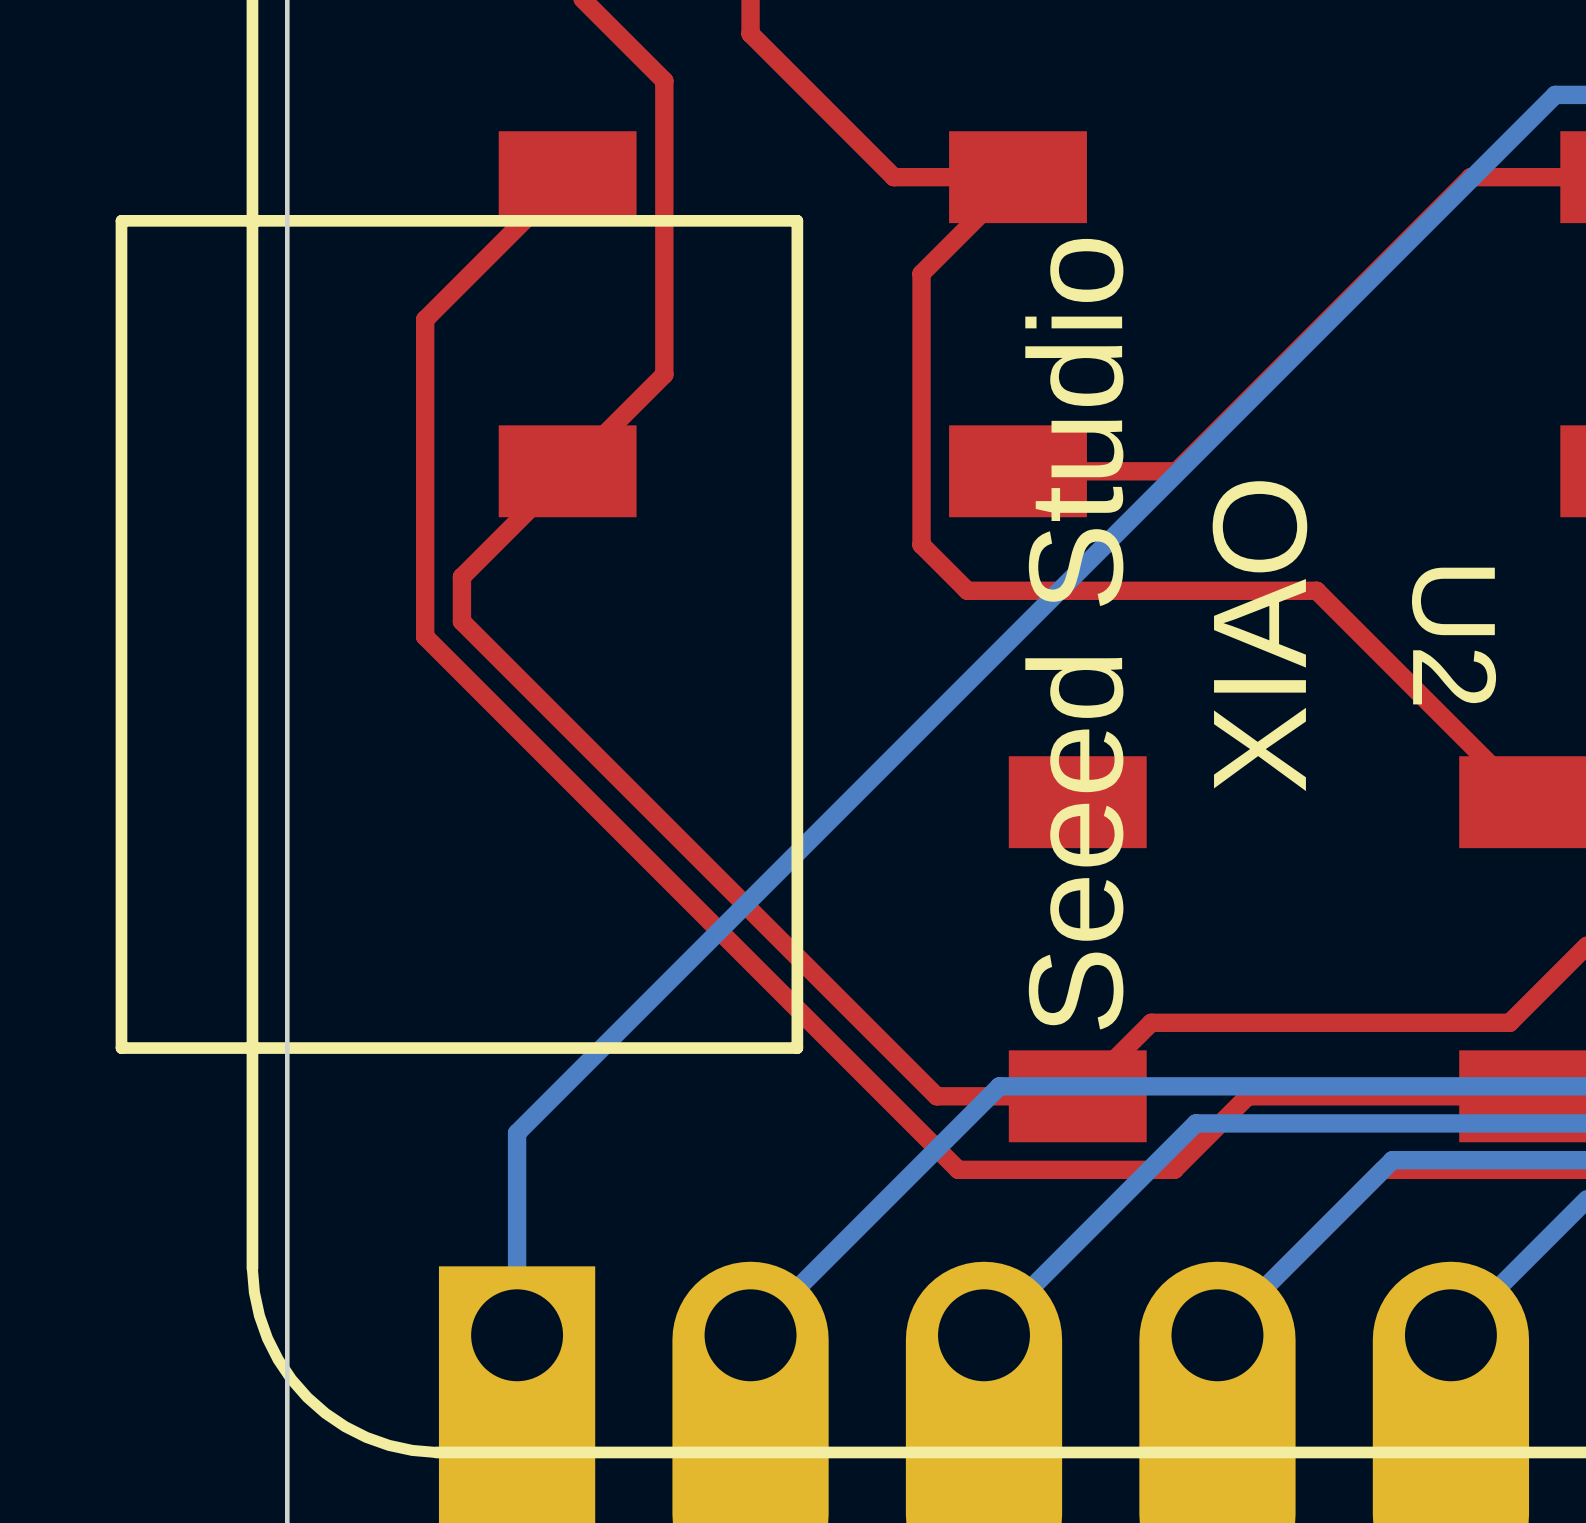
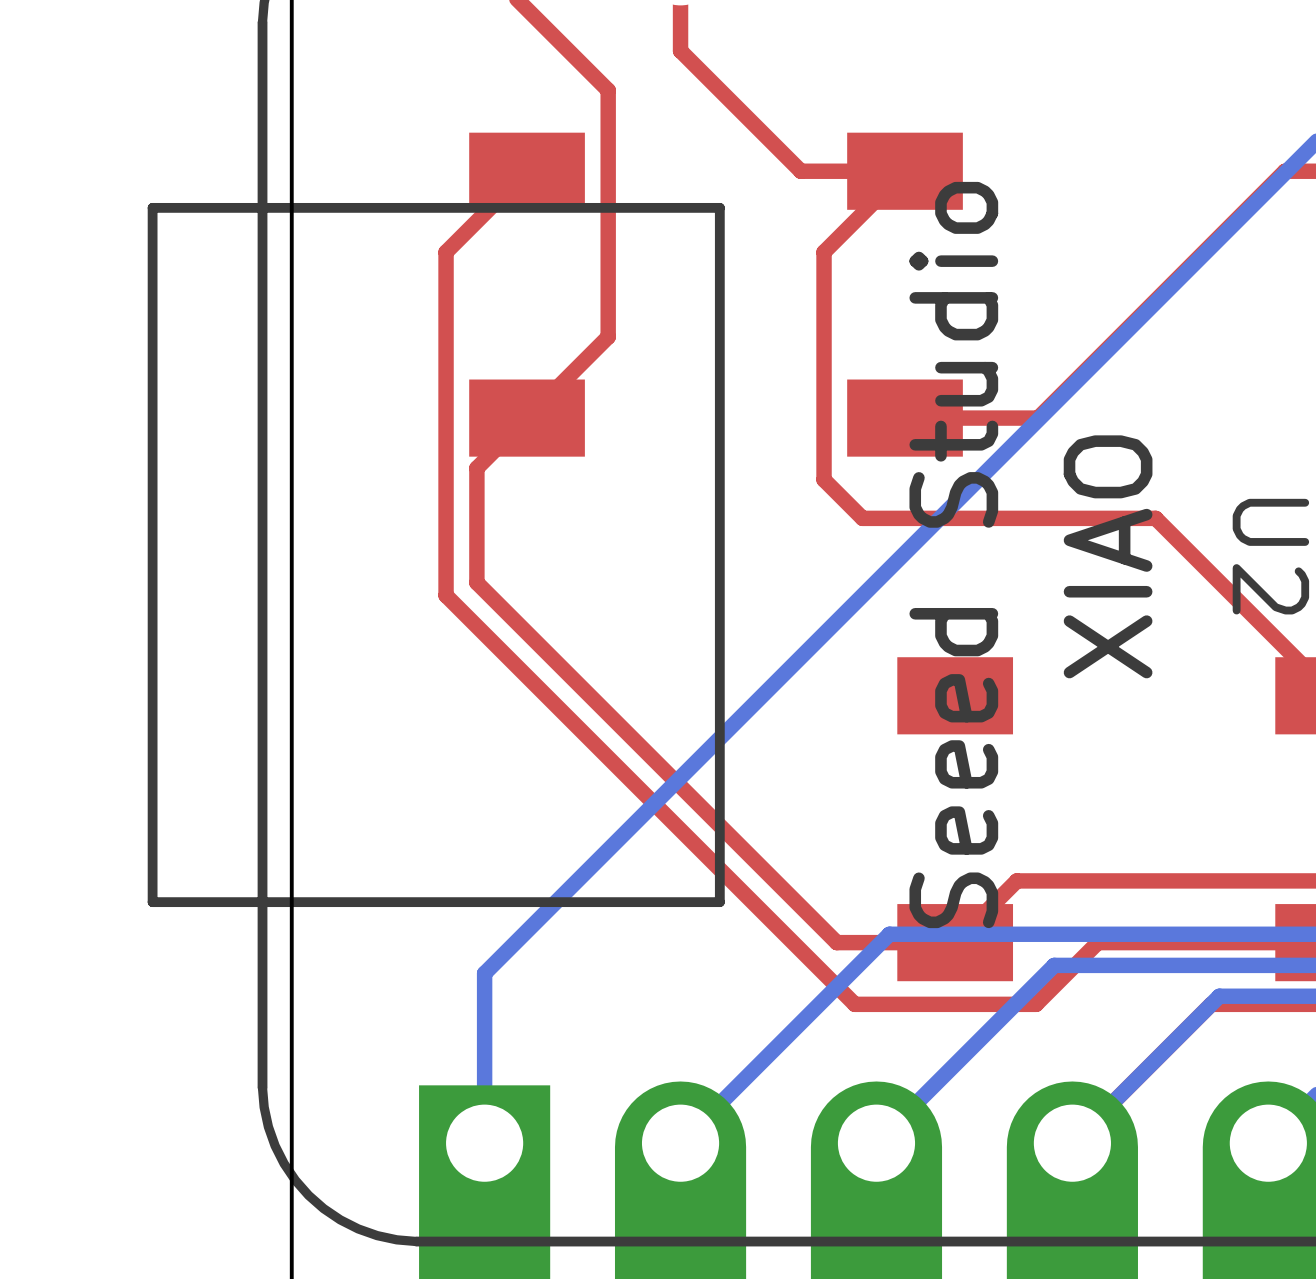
top track: (471, 273) (425, 319) (425, 636) (471, 682) -> (446, 252) (446, 595)
top track: (507, 531) (461, 576) (461, 621) (507, 667) -> (476, 468) (476, 582)

